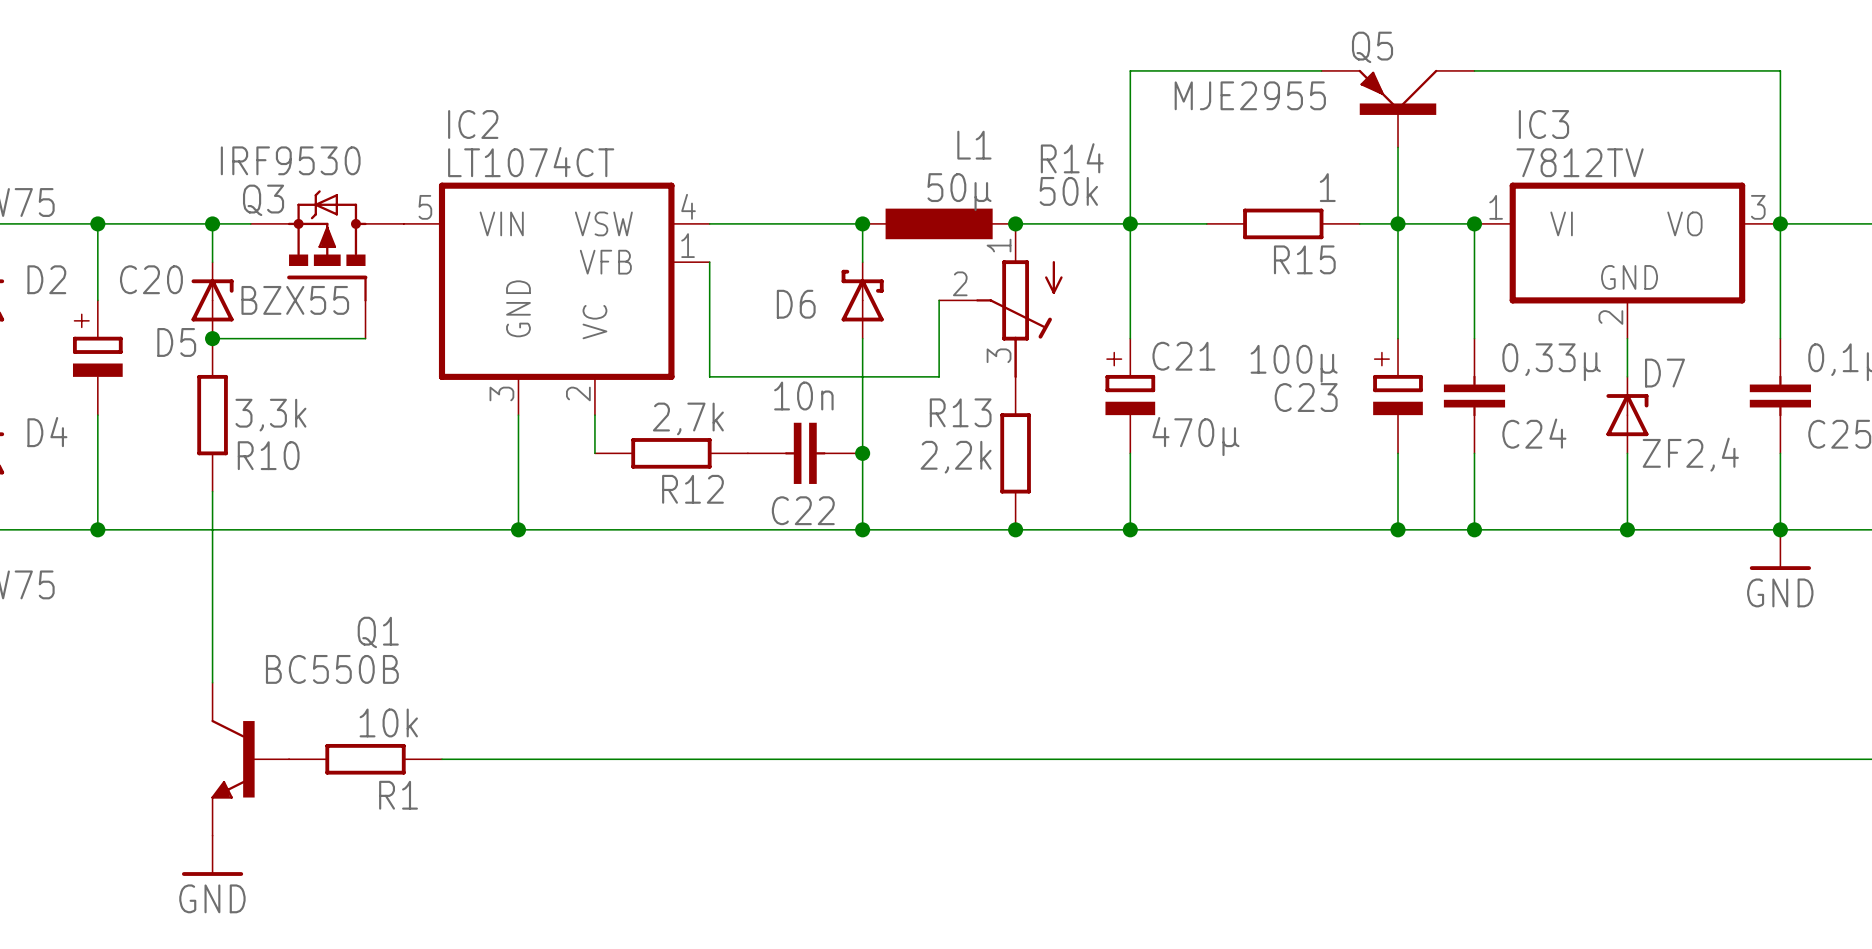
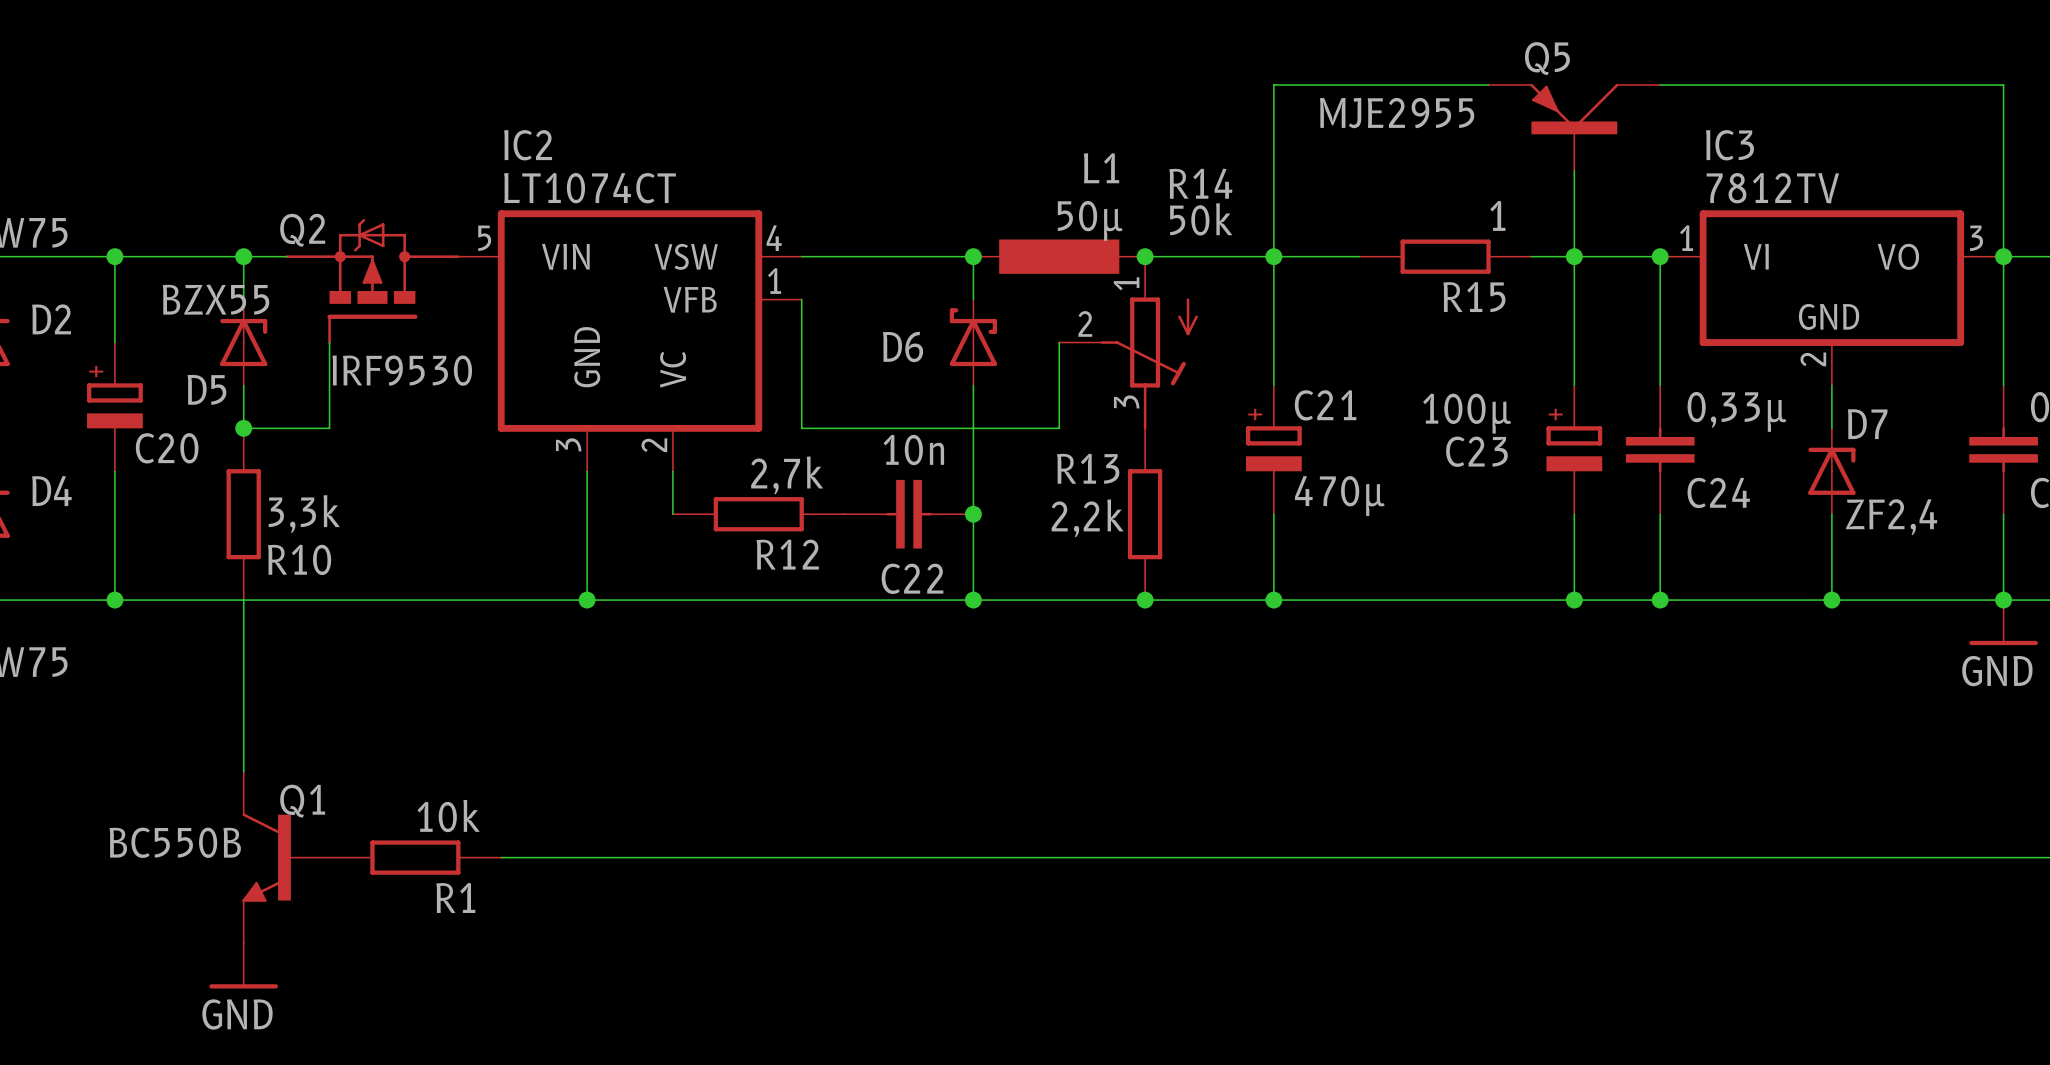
Q2: none -> IRF9530 (372, 281)
Q3: IRF9530 (327, 264) -> none
C20 name position: C20 (151, 279) -> C20 (167, 448)
D5 value position: BZX55 (295, 300) -> BZX55 (216, 299)
wire: (212, 338) (365, 338) -> (243, 385) (243, 428) (329, 428) (329, 342)
junction position: (212, 338) -> (243, 428)
R10 position: (212, 415) -> (243, 514)
Q1 name position: Q1 (378, 632) -> Q1 (302, 801)
Q1 value position: BC550B (332, 669) -> BC550B (175, 842)

